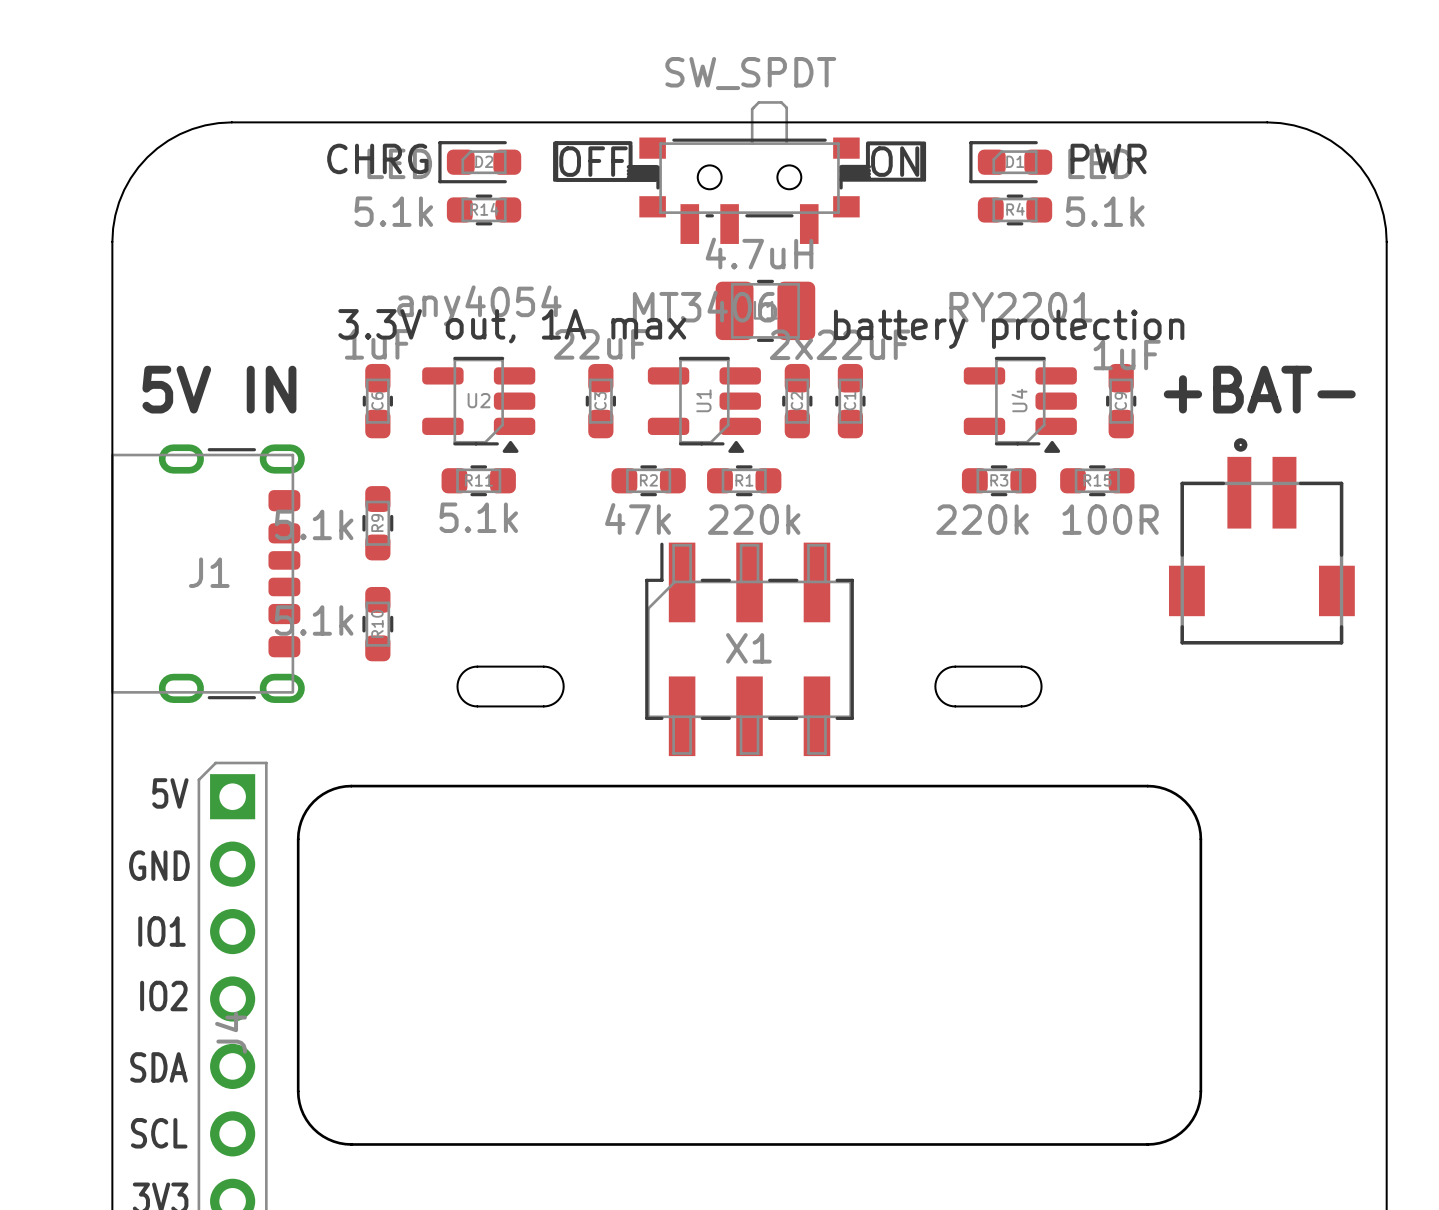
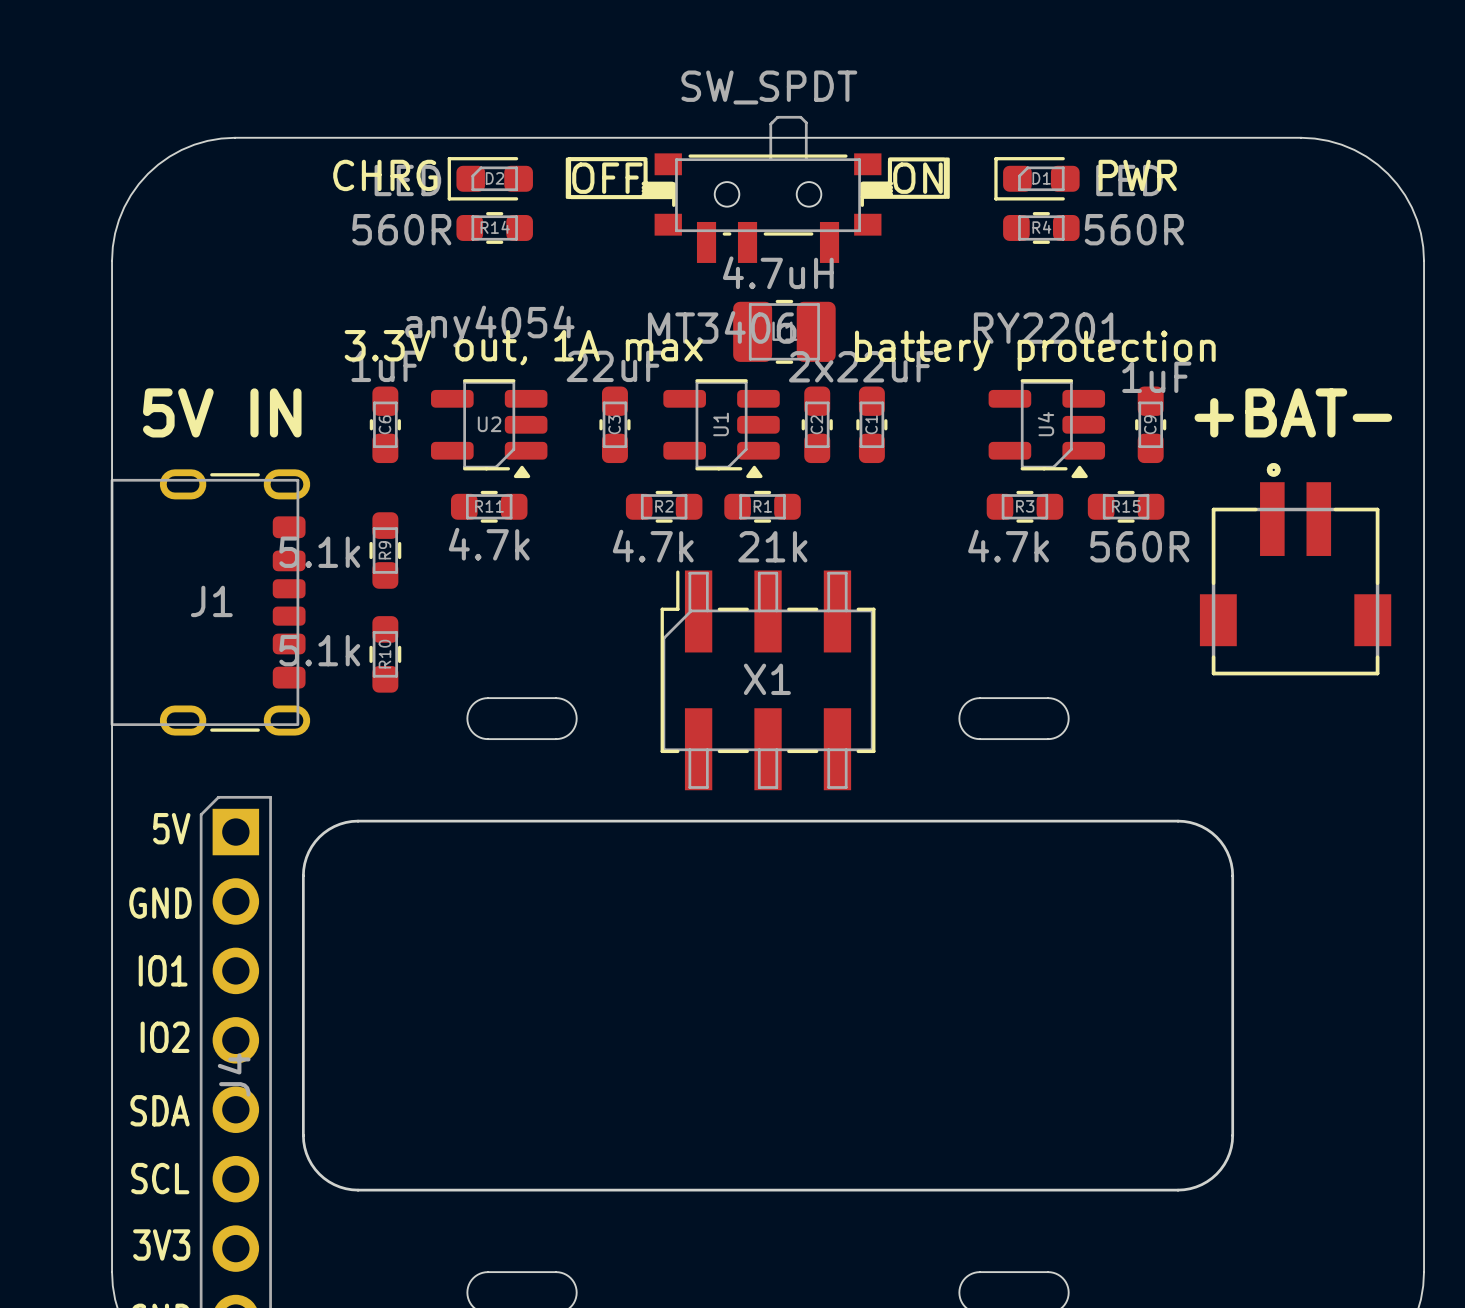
R14 value: 5.1k (393, 211) -> 560R (401, 229)
R4 value: 5.1k (1105, 211) -> 560R (1134, 229)
R11 value: 5.1k (478, 517) -> 4.7k (489, 544)
R2 value: 47k (638, 518) -> 4.7k (653, 546)
R1 value: 220k (754, 519) -> 21k (772, 546)
R3 value: 220k (982, 519) -> 4.7k (1008, 546)
R15 value: 100R (1110, 519) -> 560R (1139, 546)

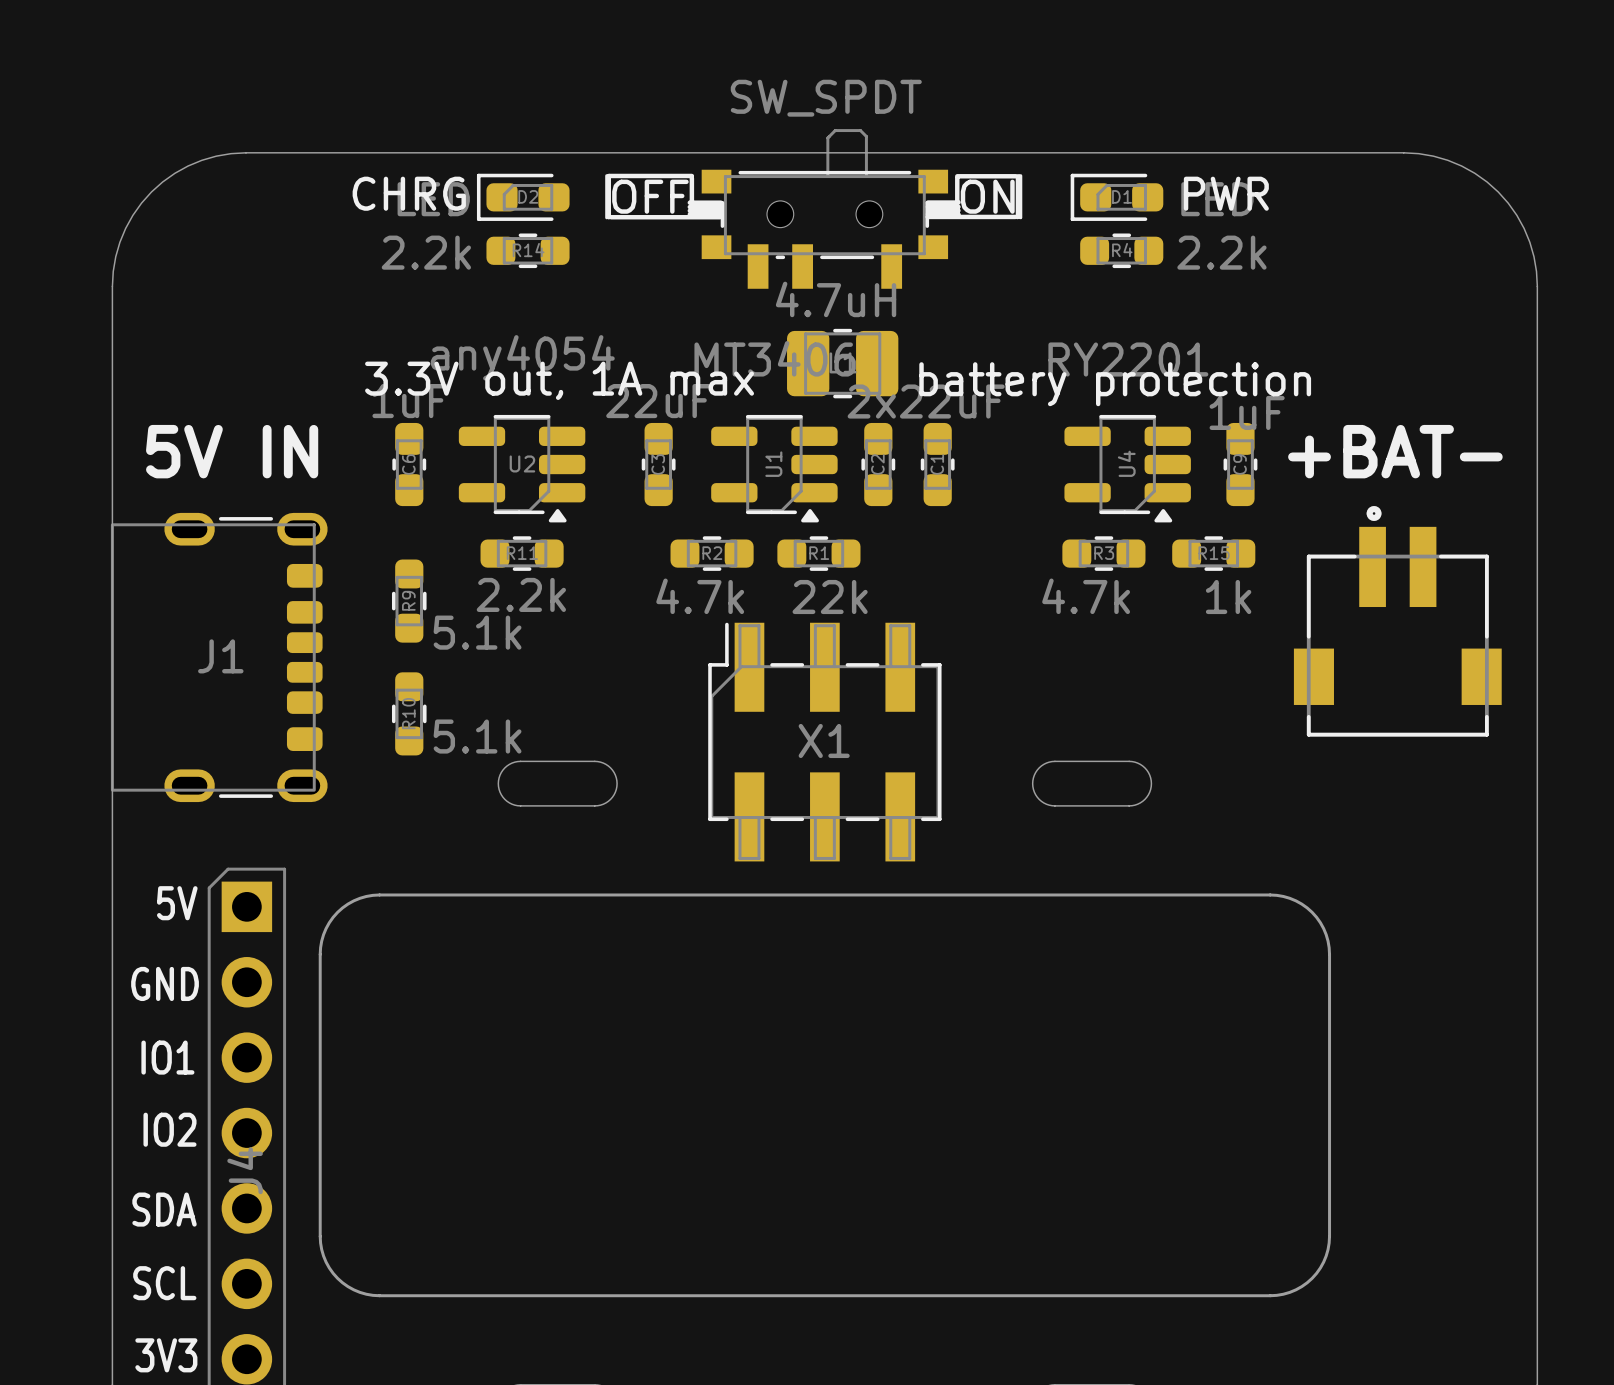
R14 value: 560R (401, 229) -> 2.2k (426, 252)
R4 value: 560R (1134, 229) -> 2.2k (1221, 252)
R11 value: 4.7k (489, 544) -> 2.2k (521, 594)
R1 value: 21k (772, 546) -> 22k (830, 597)
R15 value: 560R (1139, 546) -> 1k (1228, 597)
R9 value position: 5.1k (319, 552) -> 5.1k (477, 632)
R10 value position: 5.1k (319, 650) -> 5.1k (477, 736)

